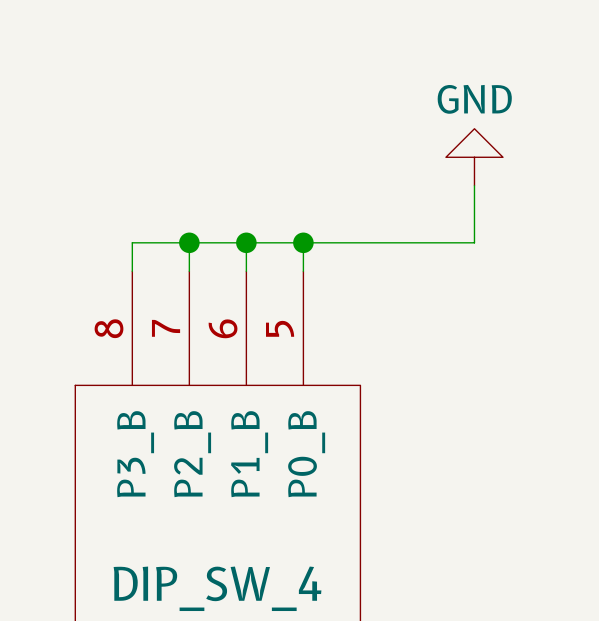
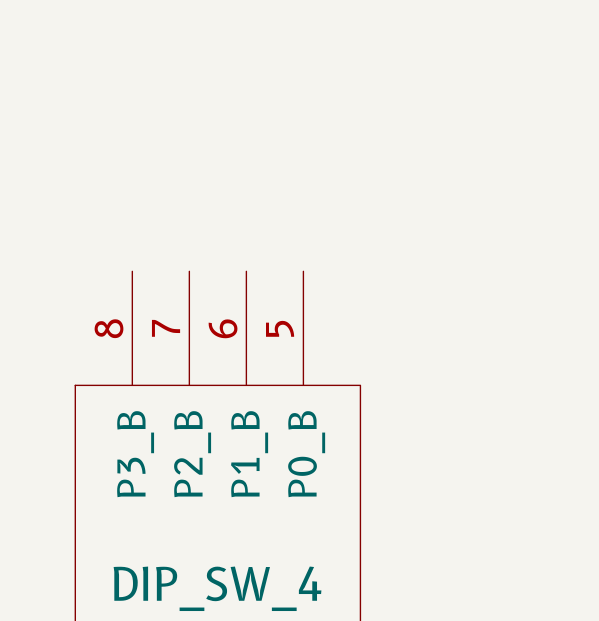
power symbol: (474, 157) -> none
wire: (474, 185) (474, 242) (132, 242) (132, 271) -> none
wire: (189, 242) (189, 271) -> none
junction: (189, 242) -> none
wire: (246, 242) (246, 271) -> none
junction: (246, 242) -> none
wire: (303, 242) (303, 271) -> none
junction: (303, 242) -> none

